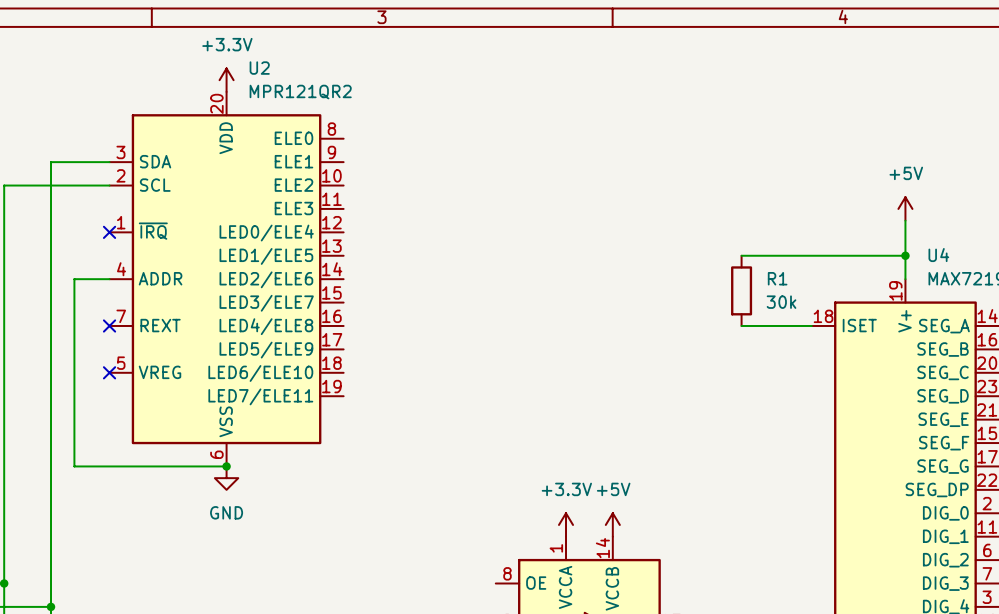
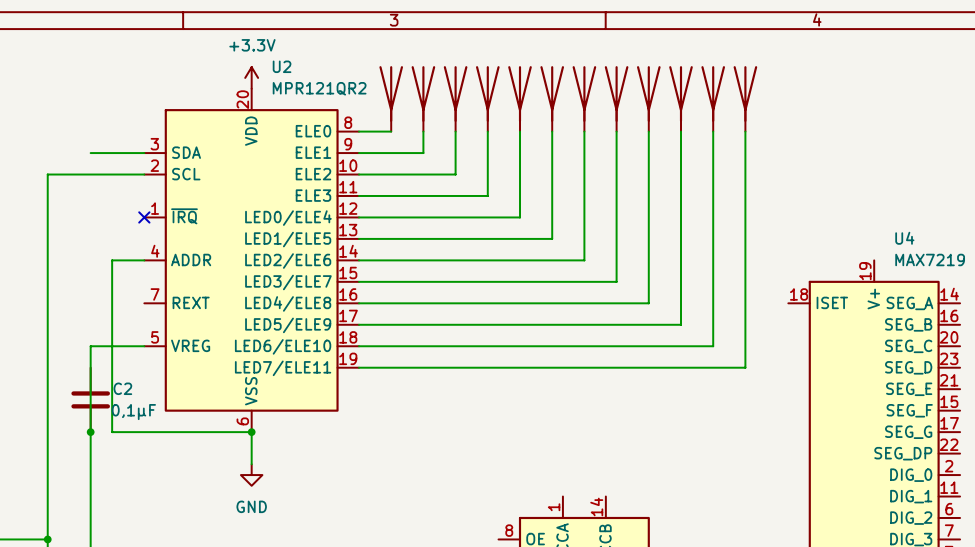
part: none -> (391, 98)
part: none -> (423, 98)
part: none -> (455, 98)
part: none -> (487, 98)
part: none -> (520, 98)
part: none -> (552, 98)
part: none -> (584, 98)
part: none -> (616, 98)
part: none -> (648, 98)
part: none -> (681, 98)
part: none -> (713, 98)
part: none -> (745, 98)
wire: none -> (359, 131) (391, 131)
wire: none -> (423, 131) (423, 153) (359, 153)
wire: none -> (455, 131) (455, 174) (359, 174)
wire: none -> (487, 131) (487, 195) (359, 195)
wire: none -> (520, 131) (520, 217) (359, 217)
wire: none -> (552, 131) (552, 238) (359, 238)
wire: none -> (584, 131) (584, 260) (359, 260)
wire: none -> (616, 131) (616, 281) (359, 281)
wire: none -> (648, 131) (648, 303) (359, 303)
wire: none -> (681, 131) (681, 324) (359, 324)
wire: none -> (713, 131) (713, 346) (359, 346)
wire: none -> (745, 131) (745, 367) (359, 367)
wire: (51, 162) (51, 372) -> (144, 346) (90, 346)
power symbol: +5V (905, 208) -> none
wire: (905, 220) (905, 279) -> none
wire: (741, 255) (905, 255) -> none
junction: (905, 255) -> none
R1: 30k (741, 290) -> none
no-connect mark: (109, 325) -> none
wire: (741, 325) (811, 325) -> none
no-connect mark: (109, 372) -> none
C2: none -> 0,1µF (90, 399)
junction: none -> (90, 432)
wire: none -> (251, 432) (251, 464)
power symbol position: GND (226, 478) -> GND (251, 475)
power symbol: +3.3V (566, 524) -> none
power symbol: +5V (612, 524) -> none

